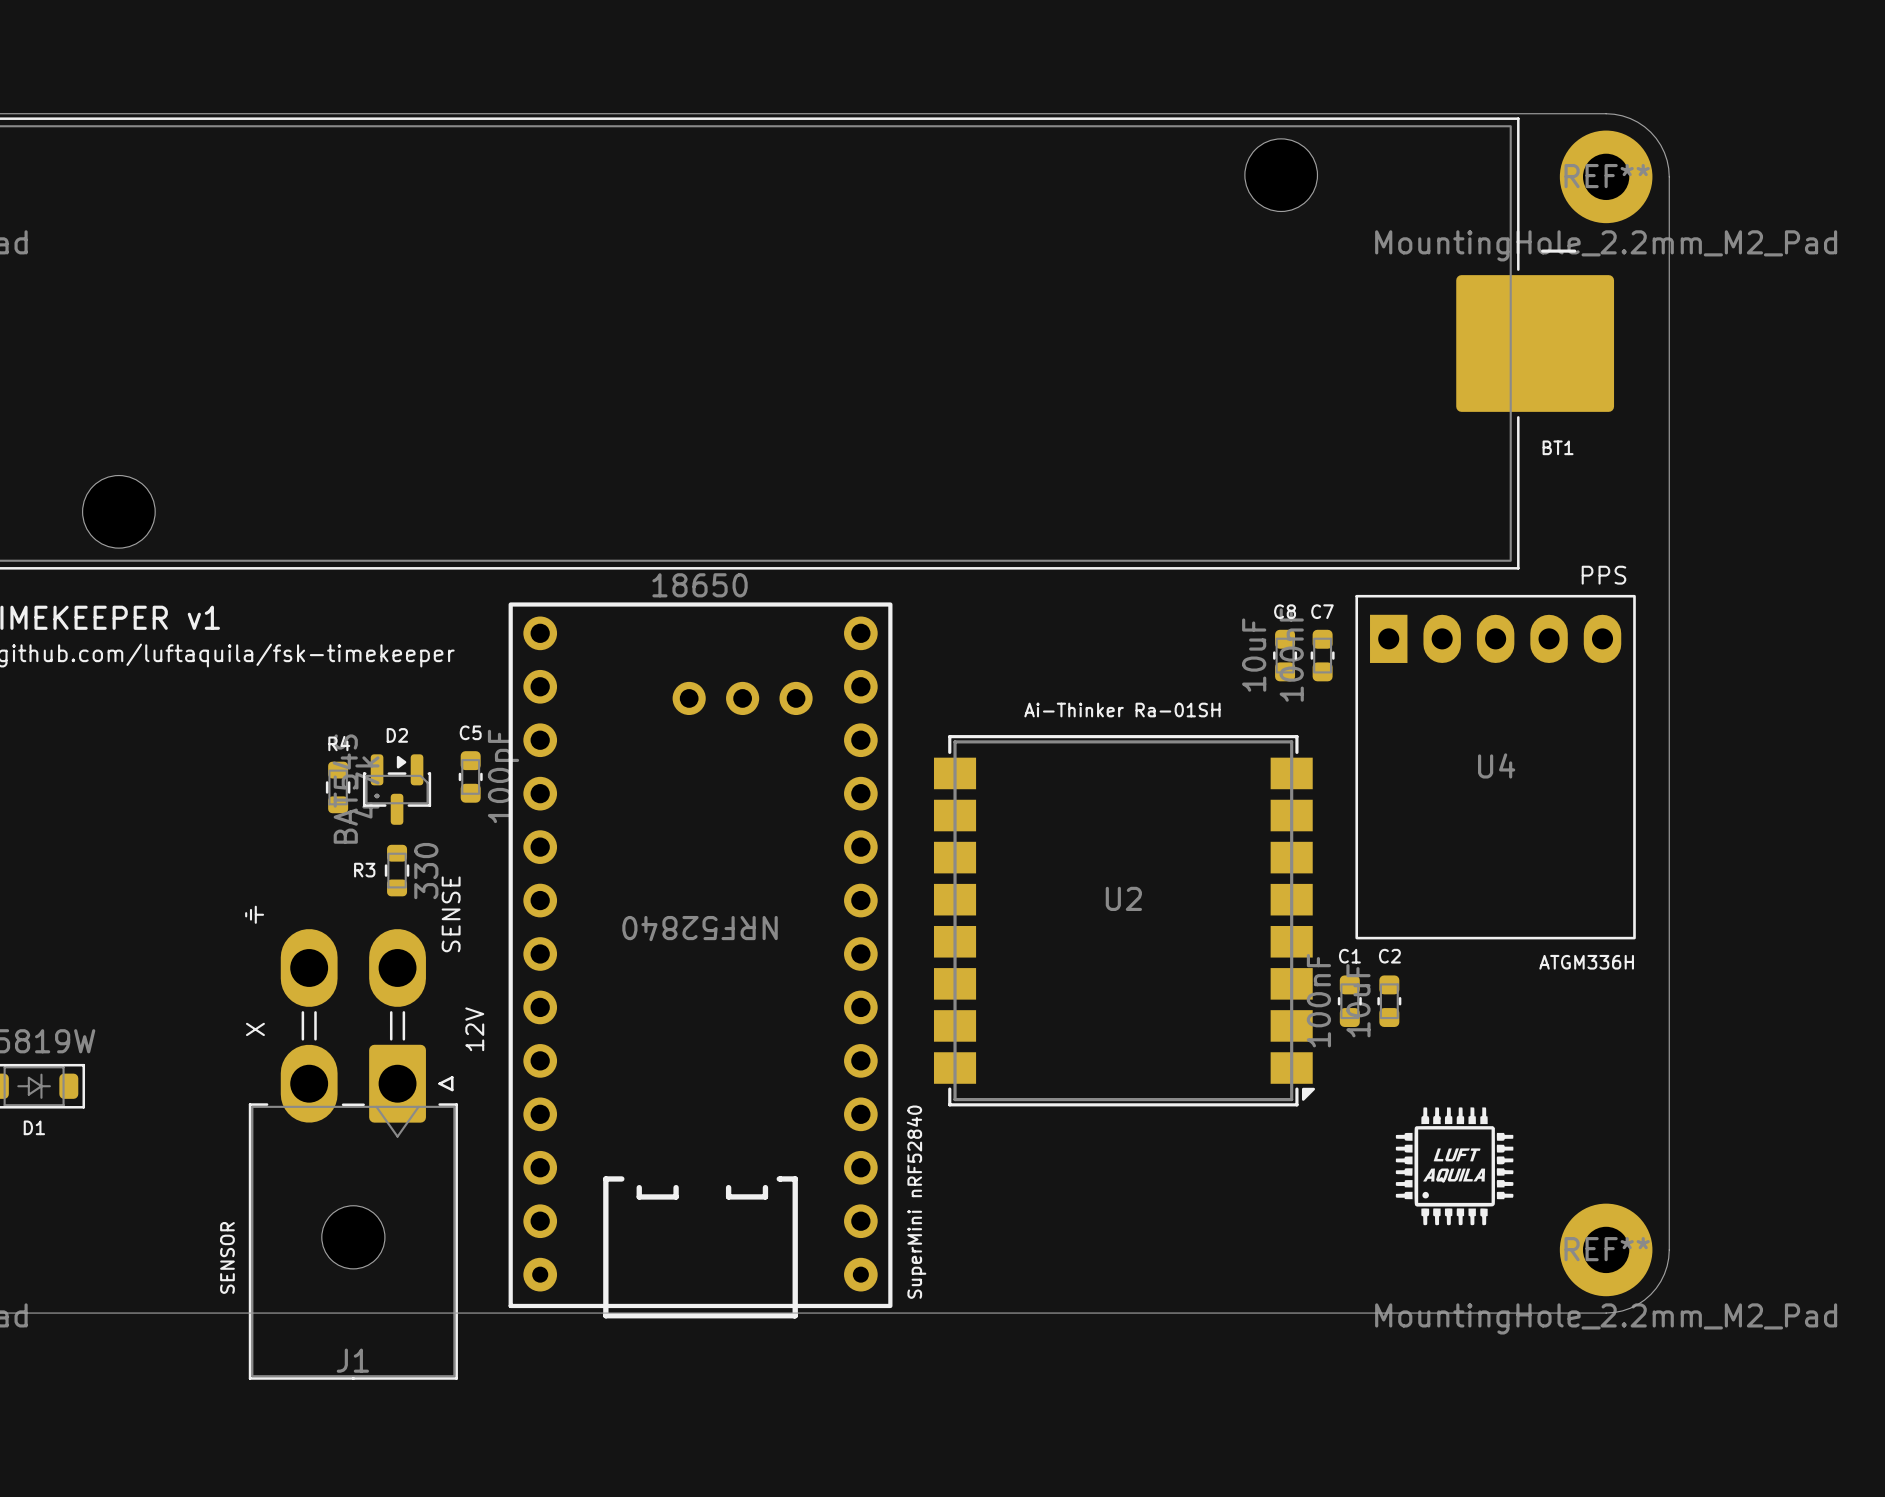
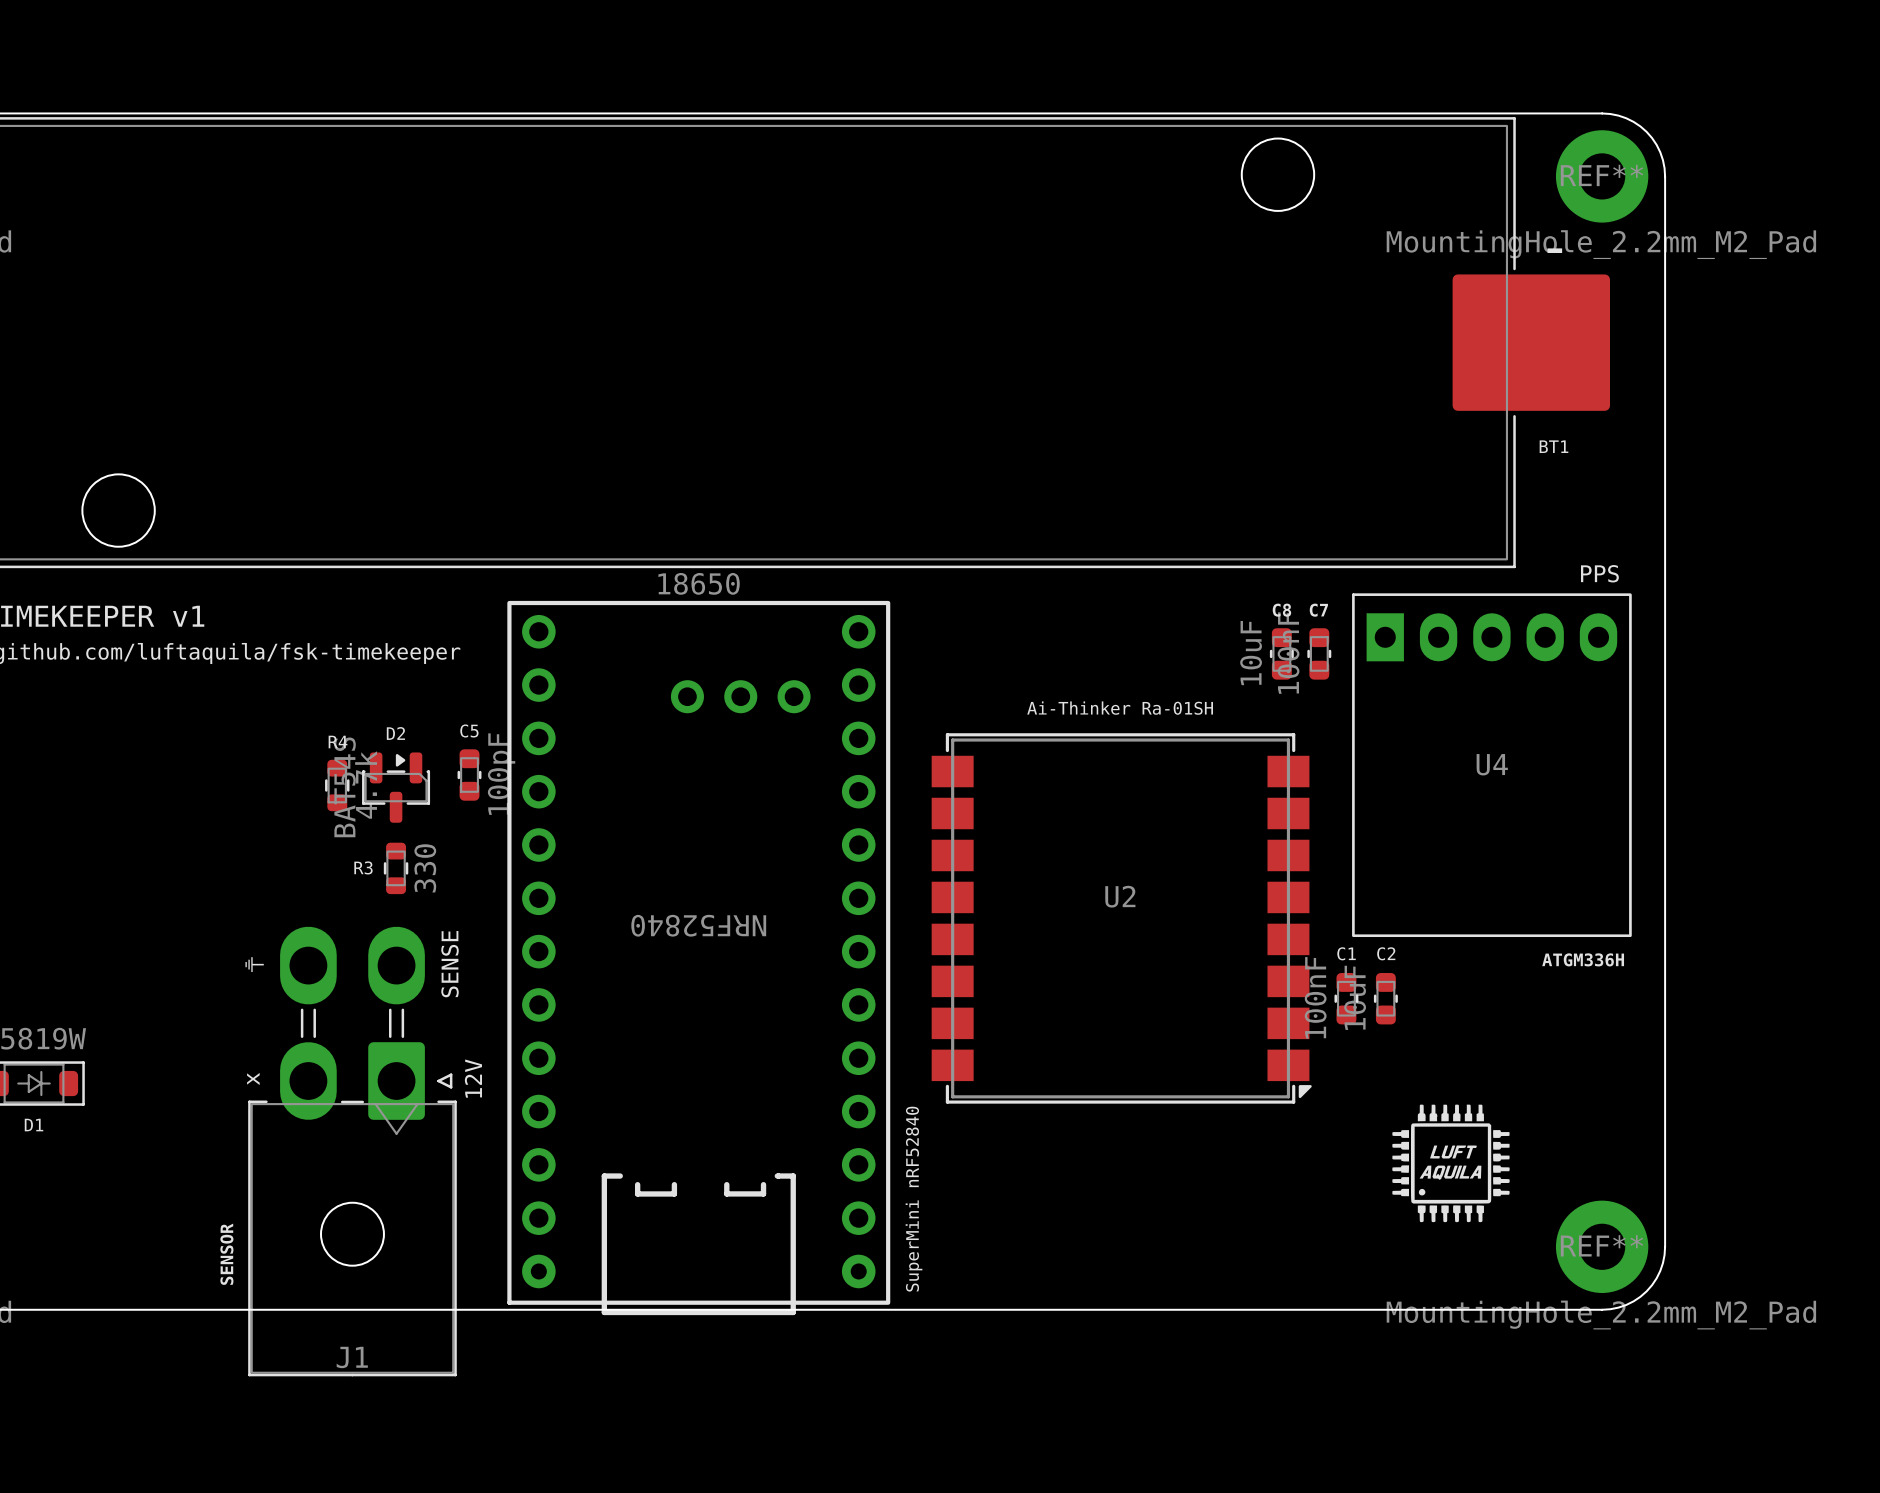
text position: ⏚ (254, 914) -> ⏚ (254, 964)
text position: SENSE (451, 914) -> SENSE (450, 964)
text: X (255, 1029) -> none
text position: 12V (474, 1029) -> 12V (473, 1078)
text: none -> x (253, 1078)

